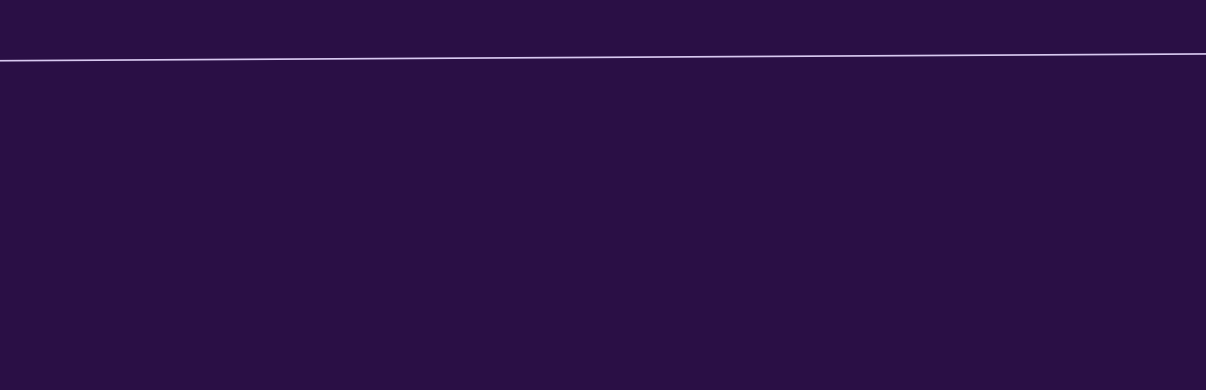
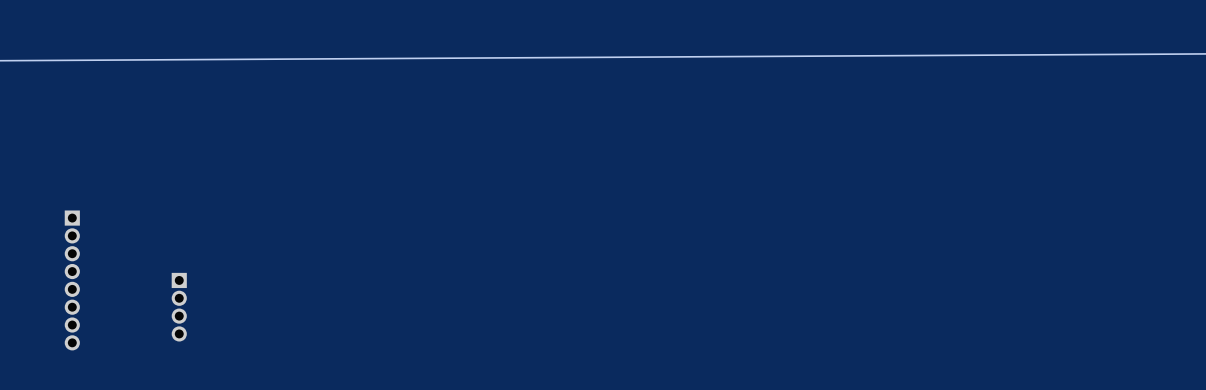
part: none -> (72, 280)
part: none -> (179, 307)

